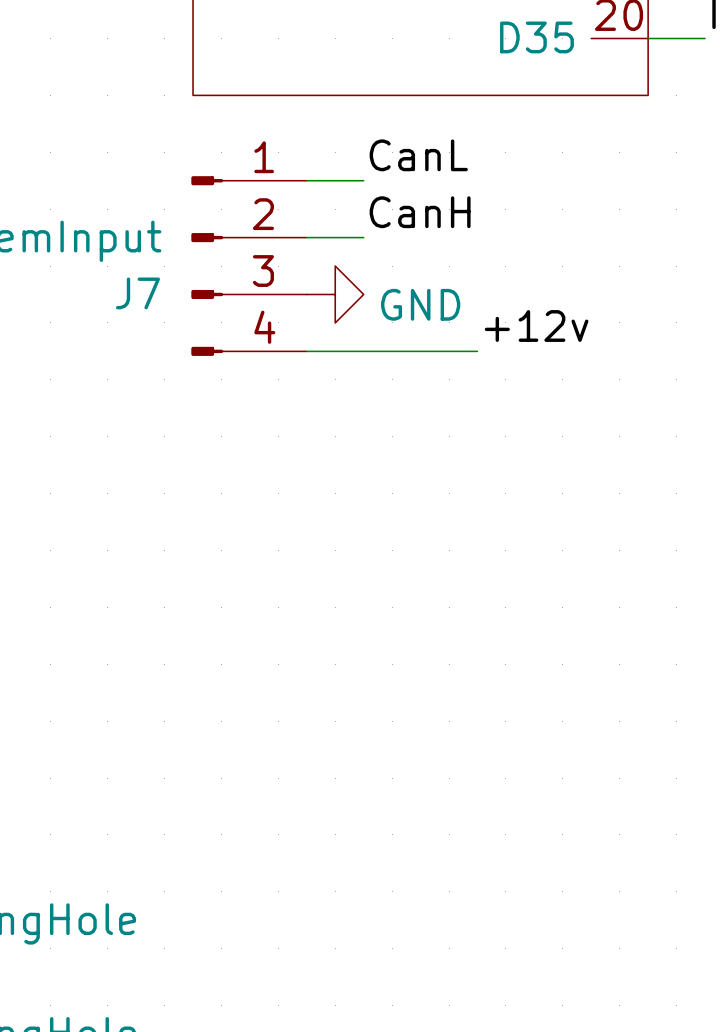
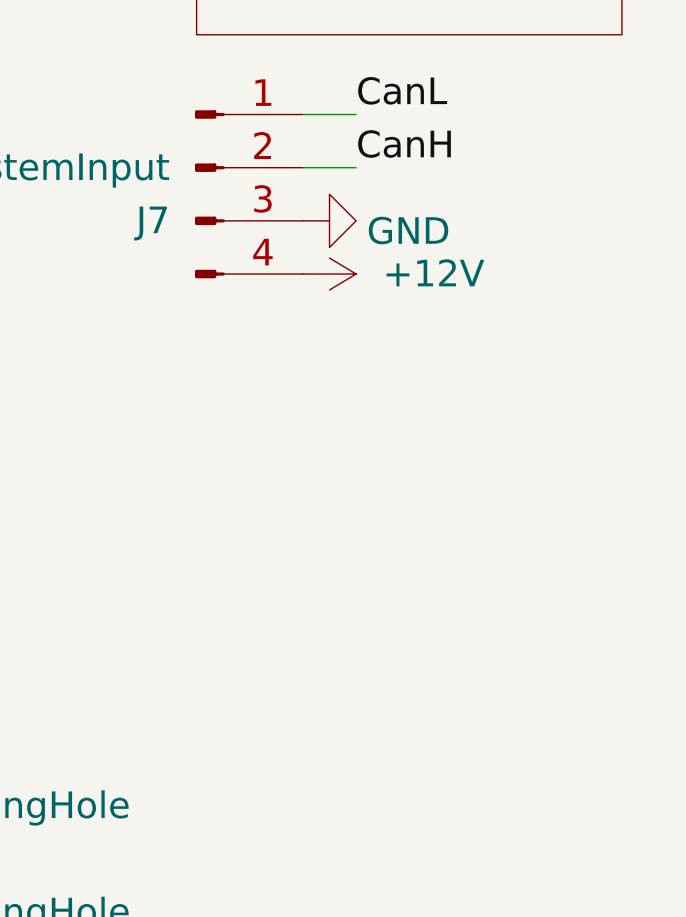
label: +12v (536, 325) -> none
wire: (306, 351) (477, 351) -> none
power symbol: none -> +12V (329, 274)

